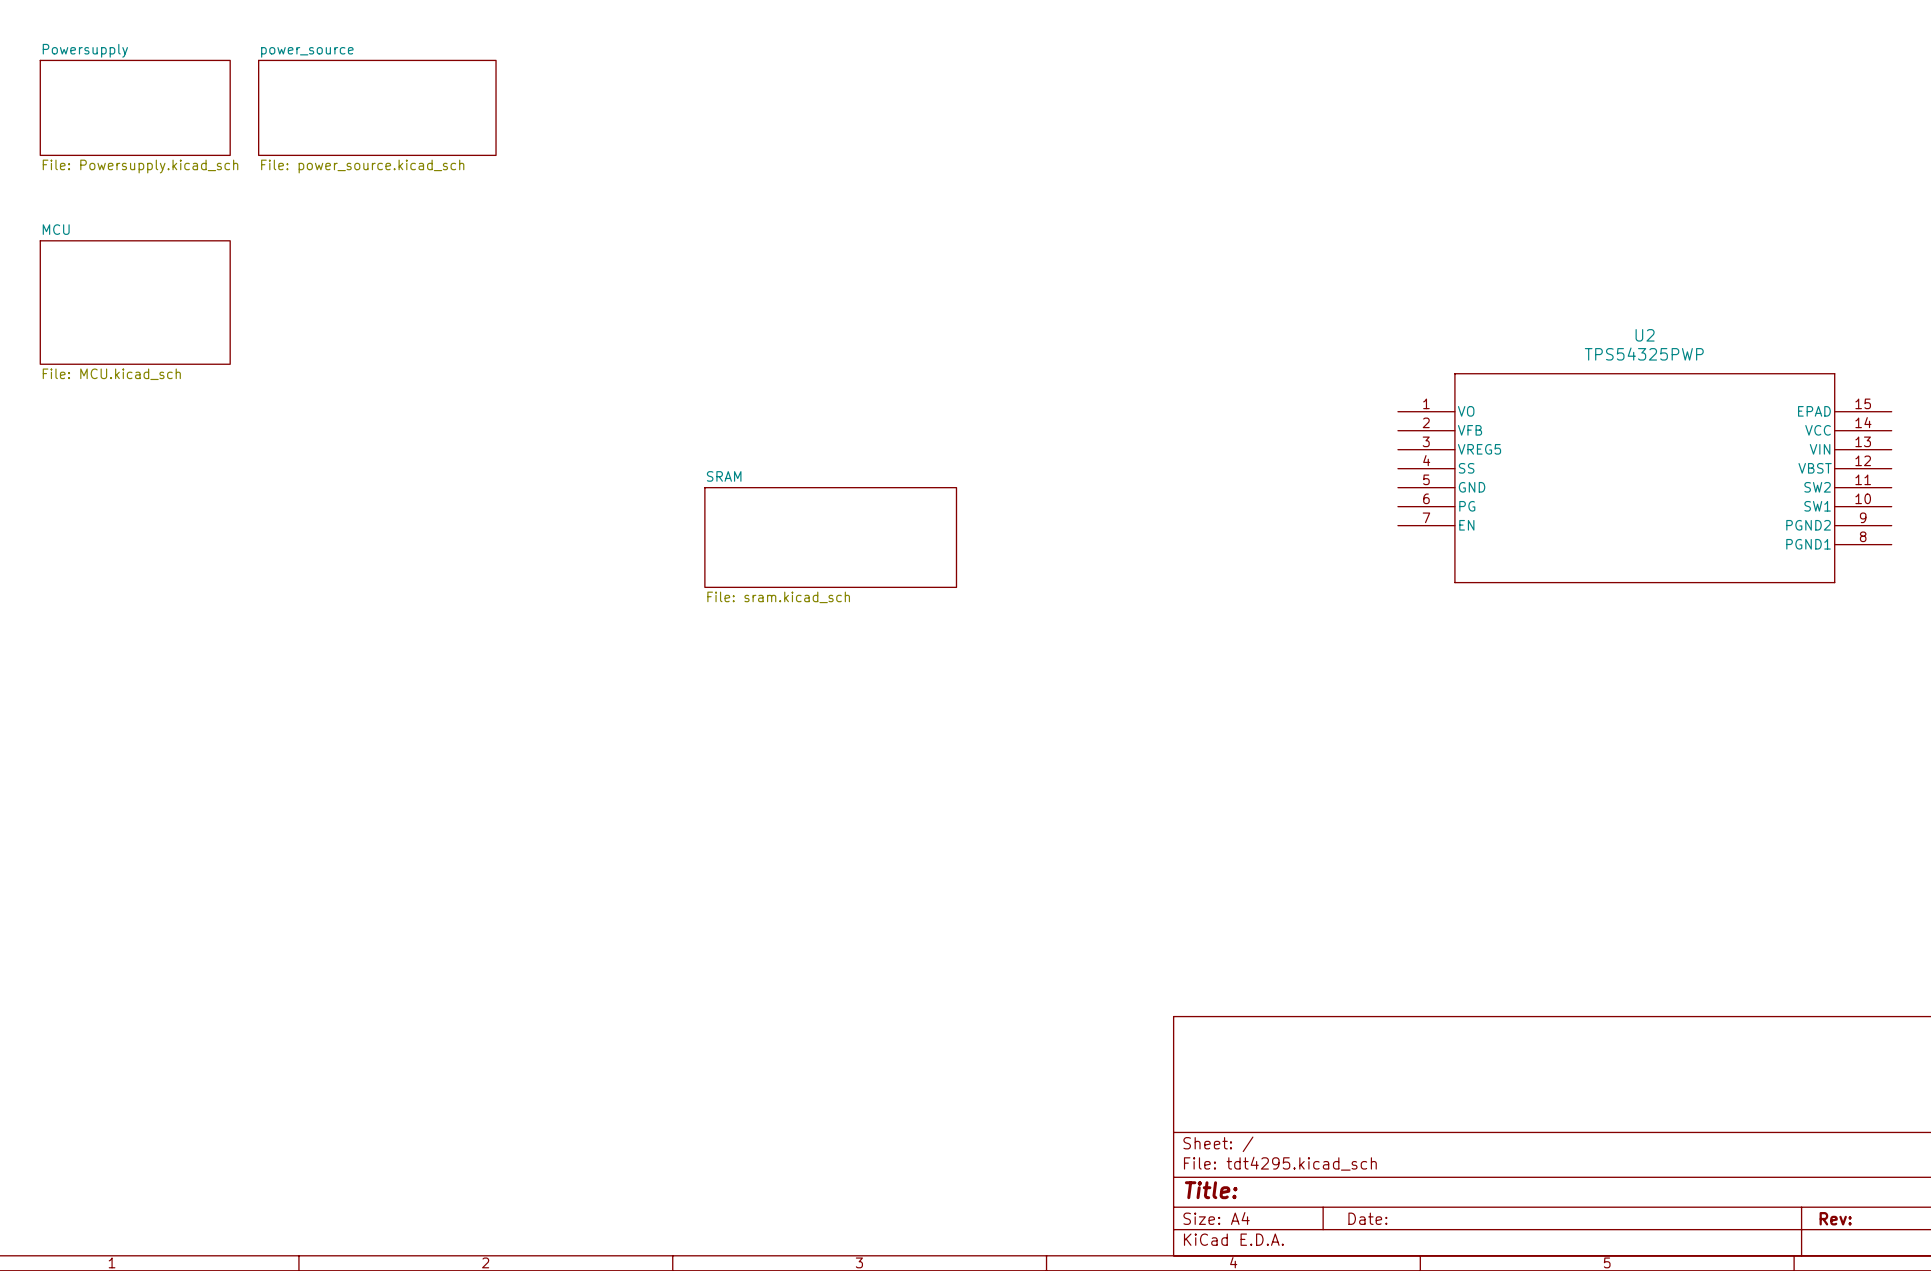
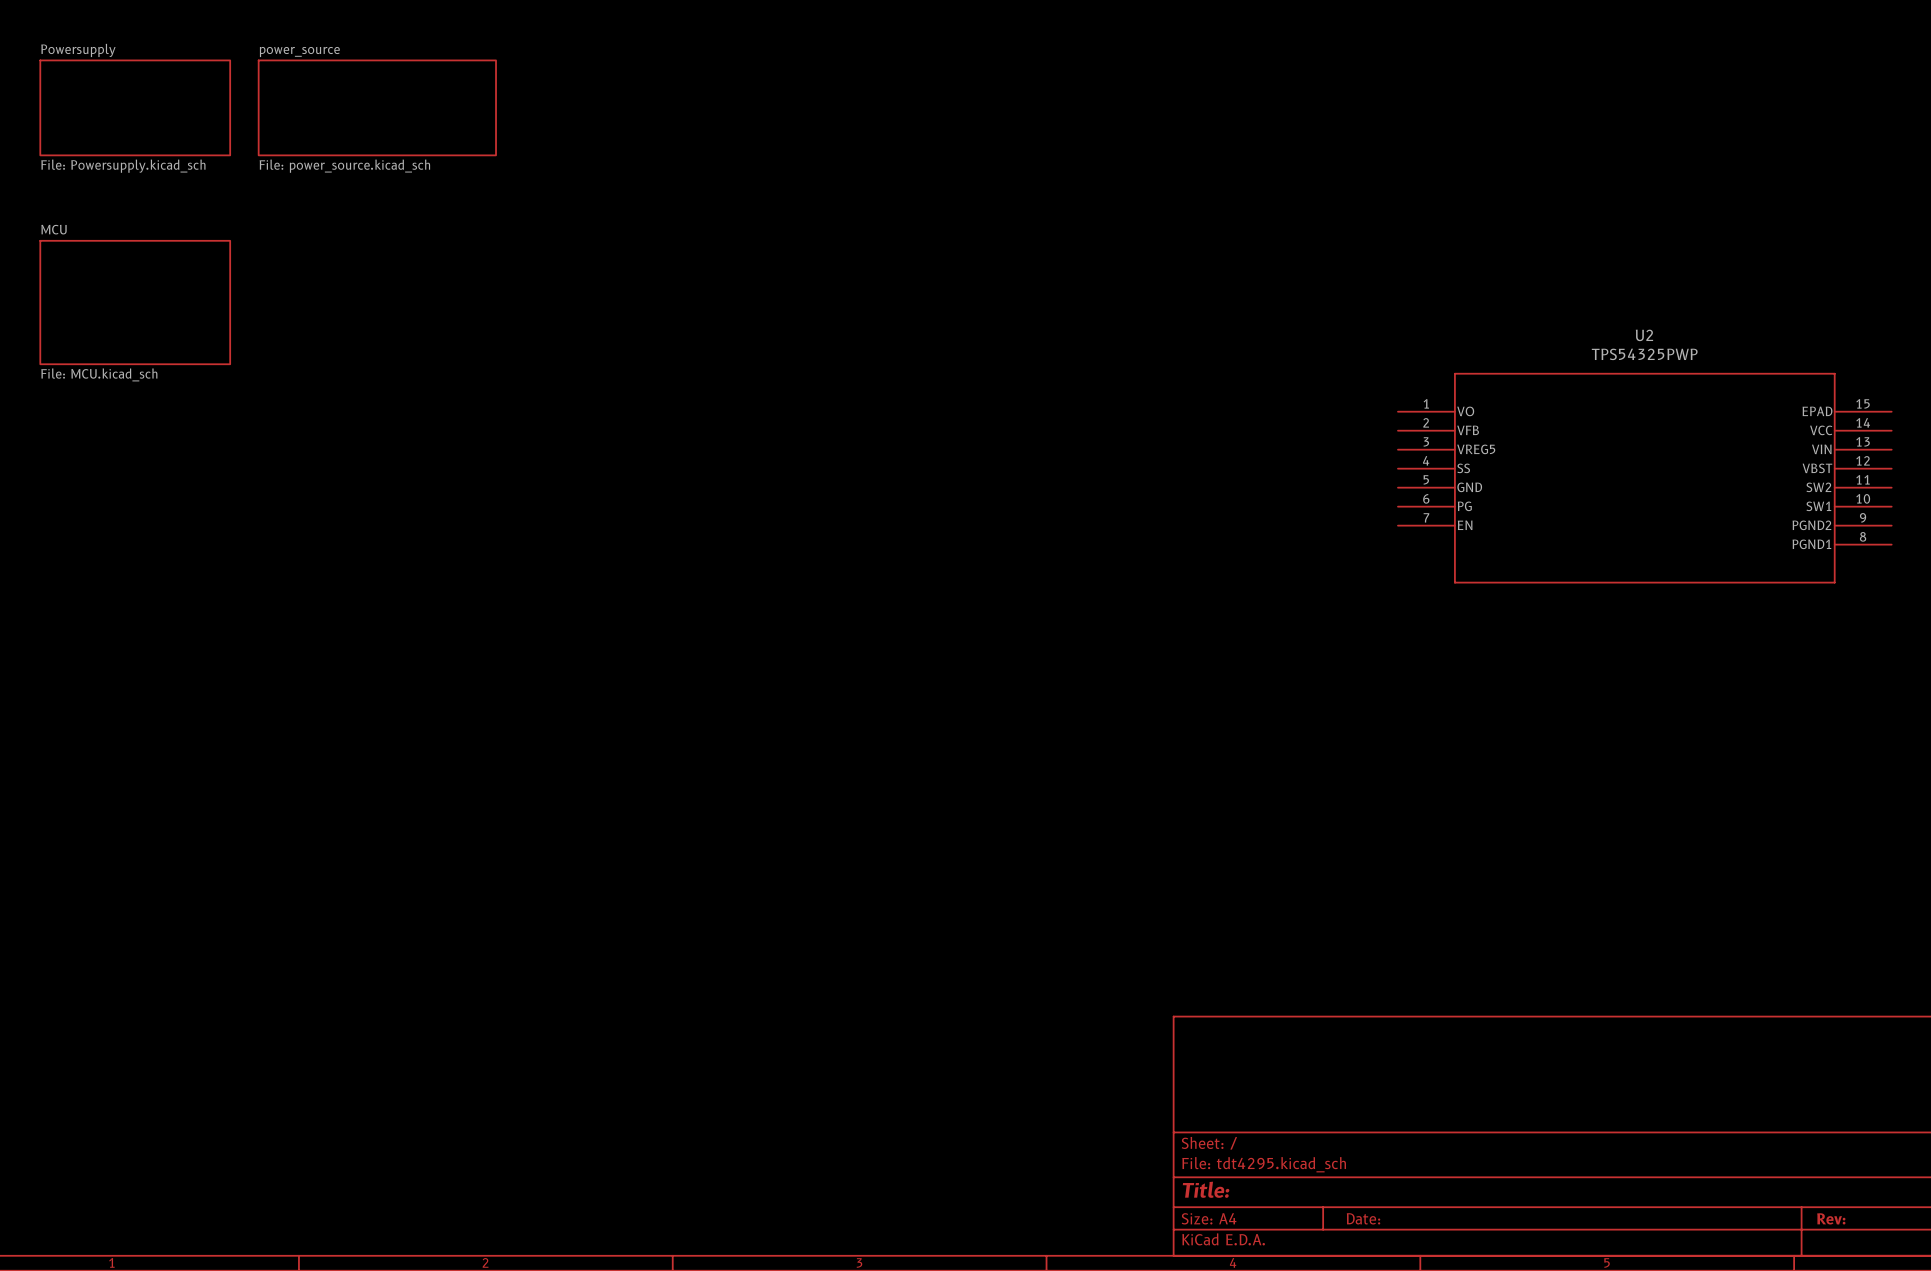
sheet SRAM: File: sram.kicad_sch (830, 537) -> none

